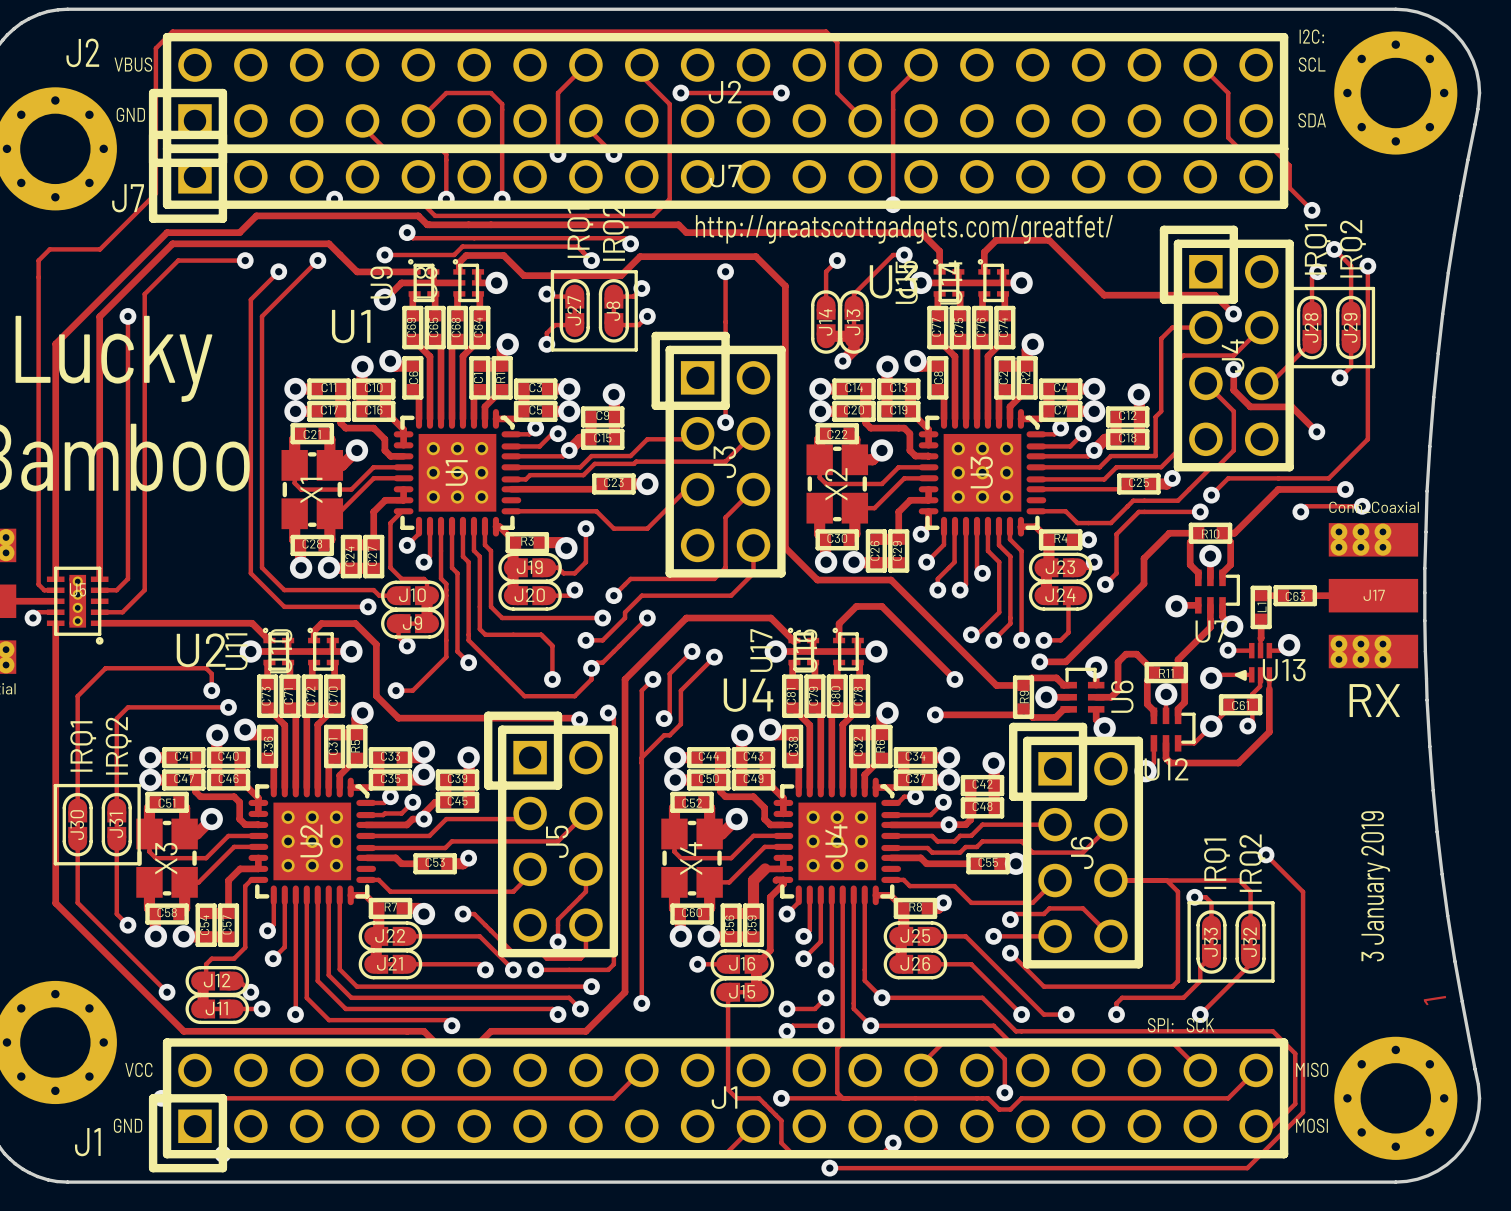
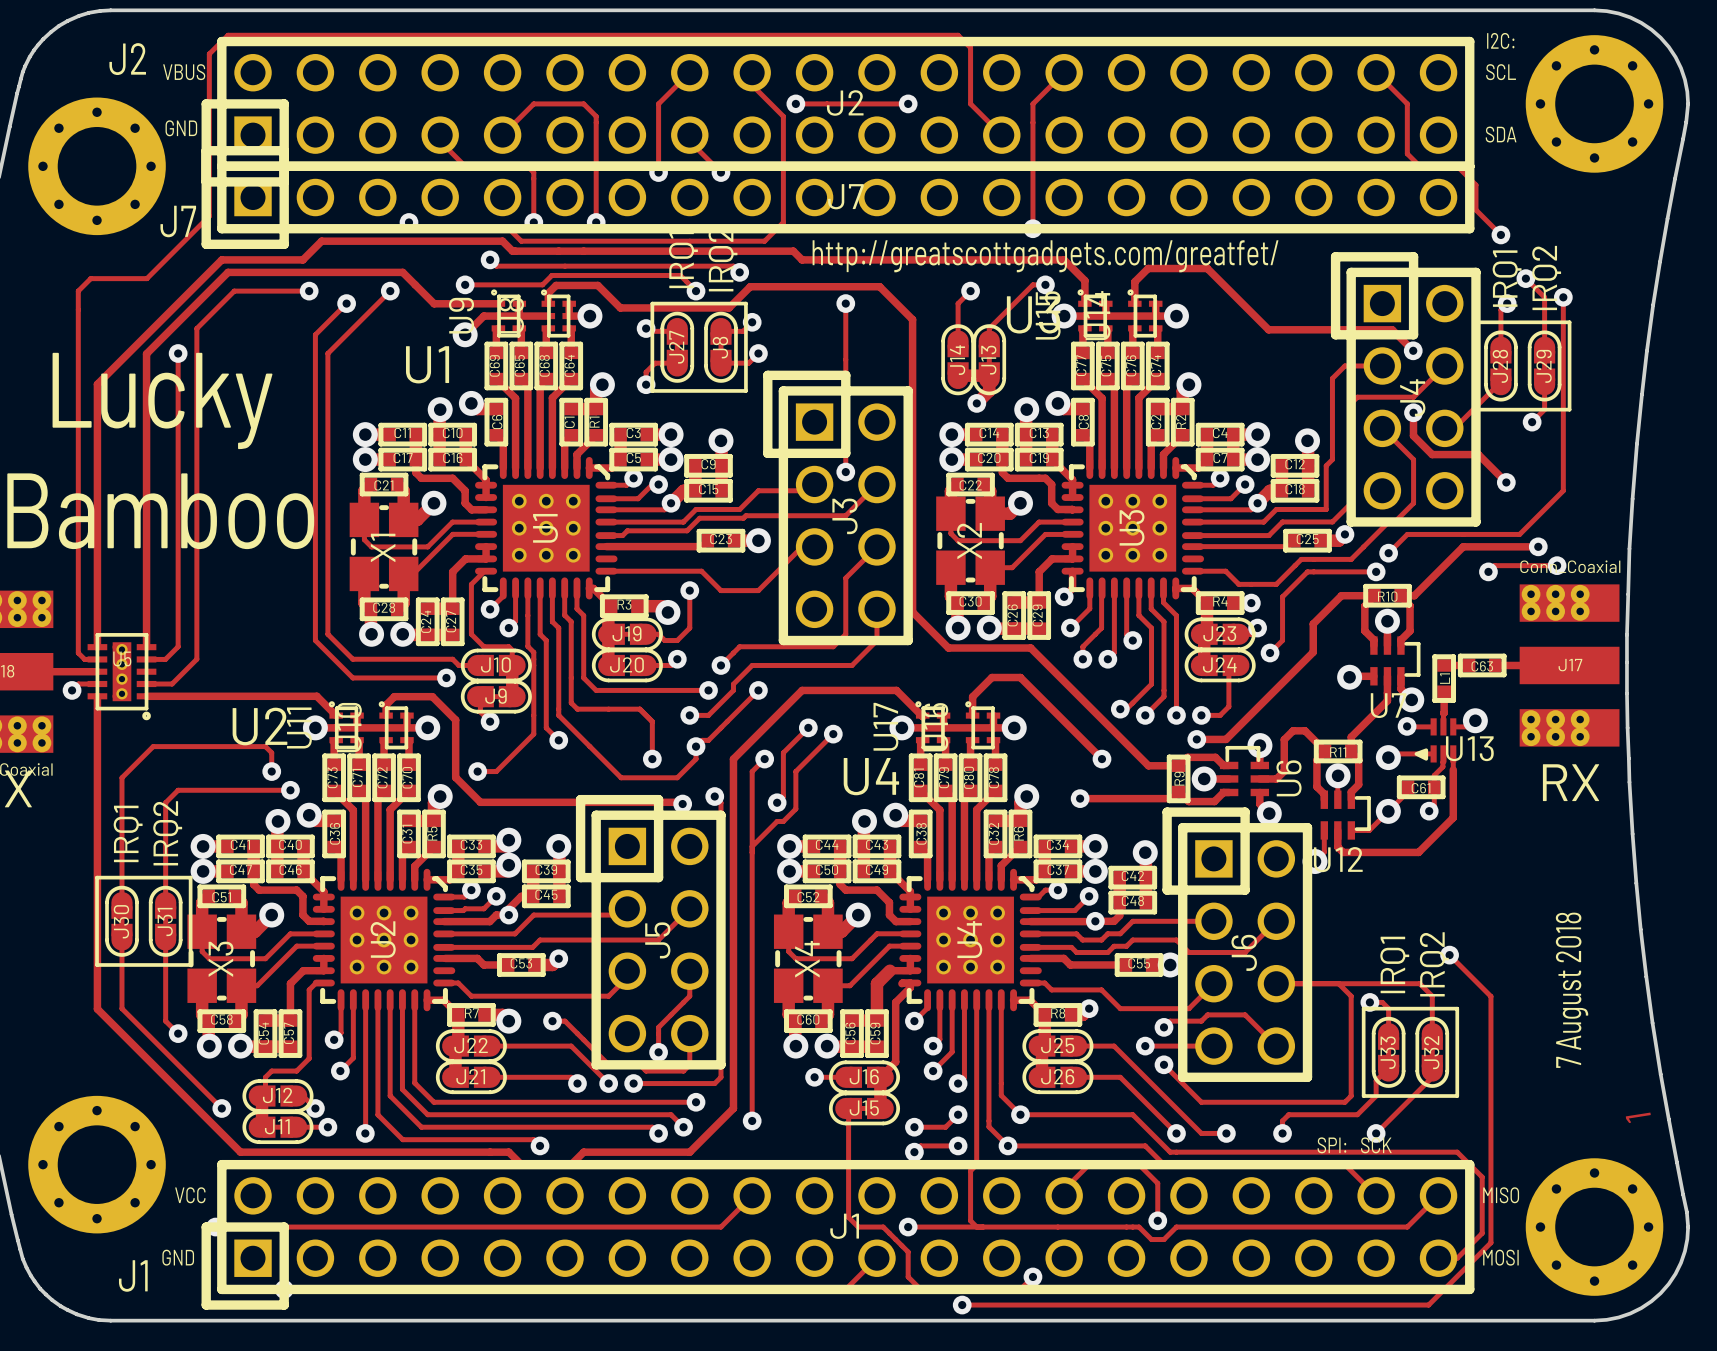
text: 3 January 2019 (1375, 886) -> 7 August 2018 (1572, 990)

